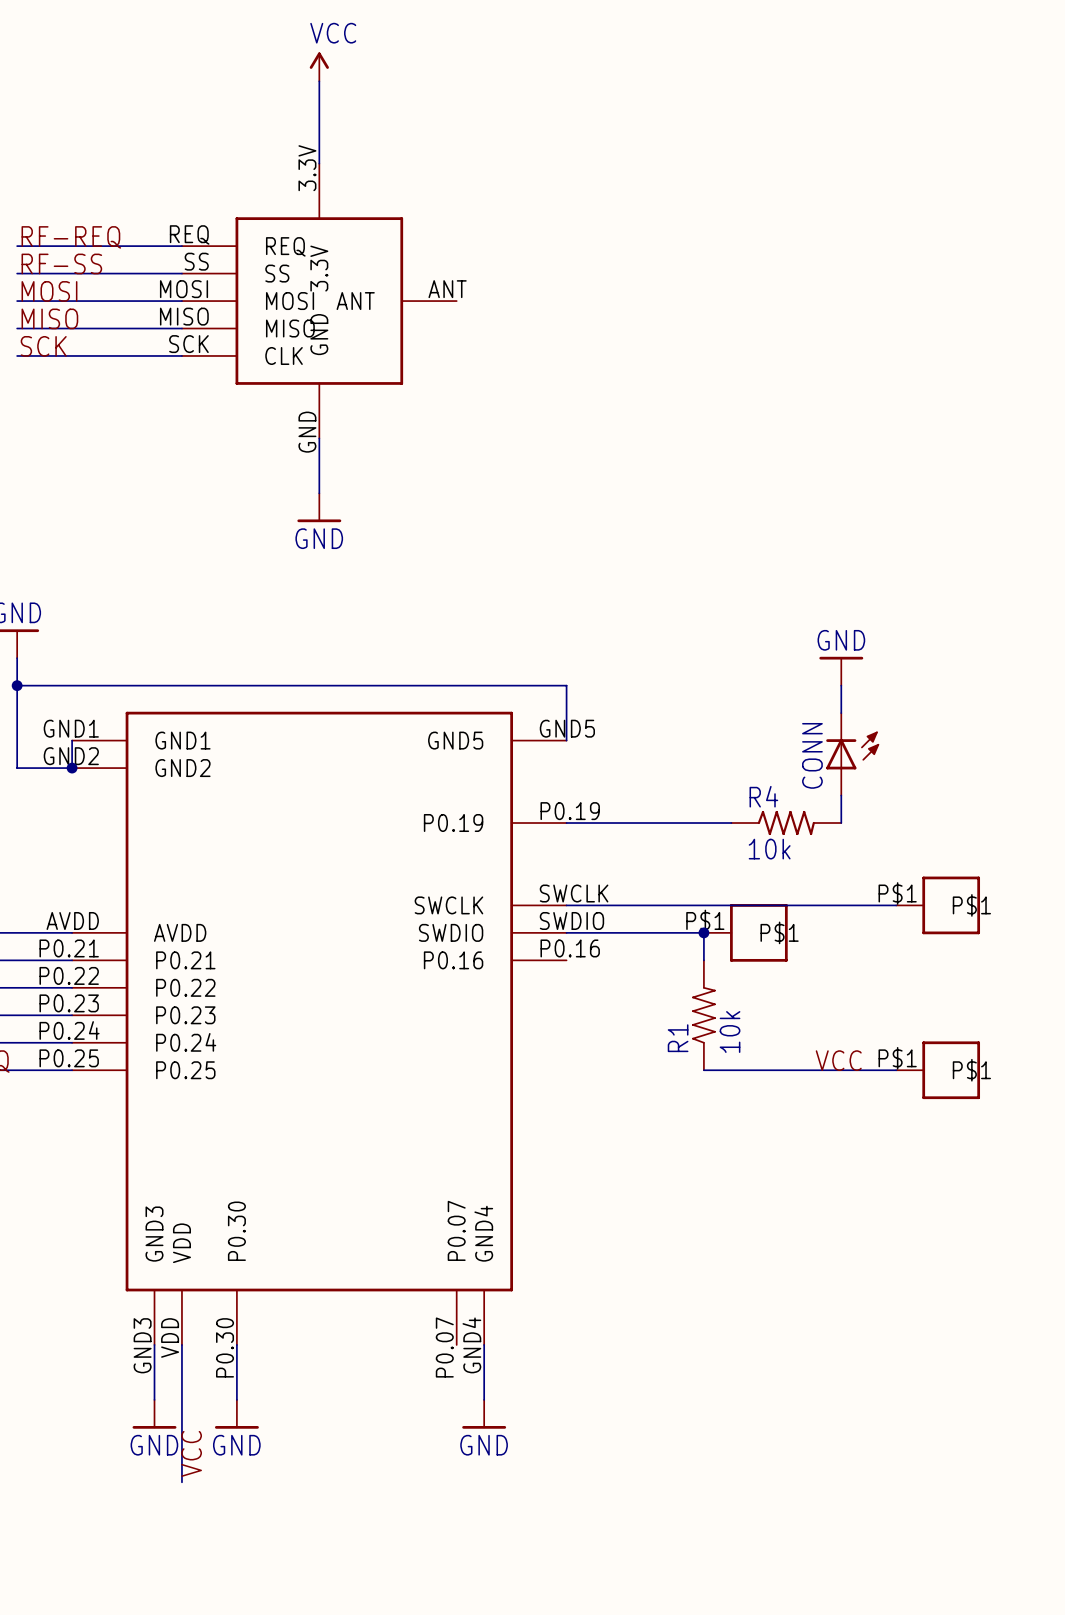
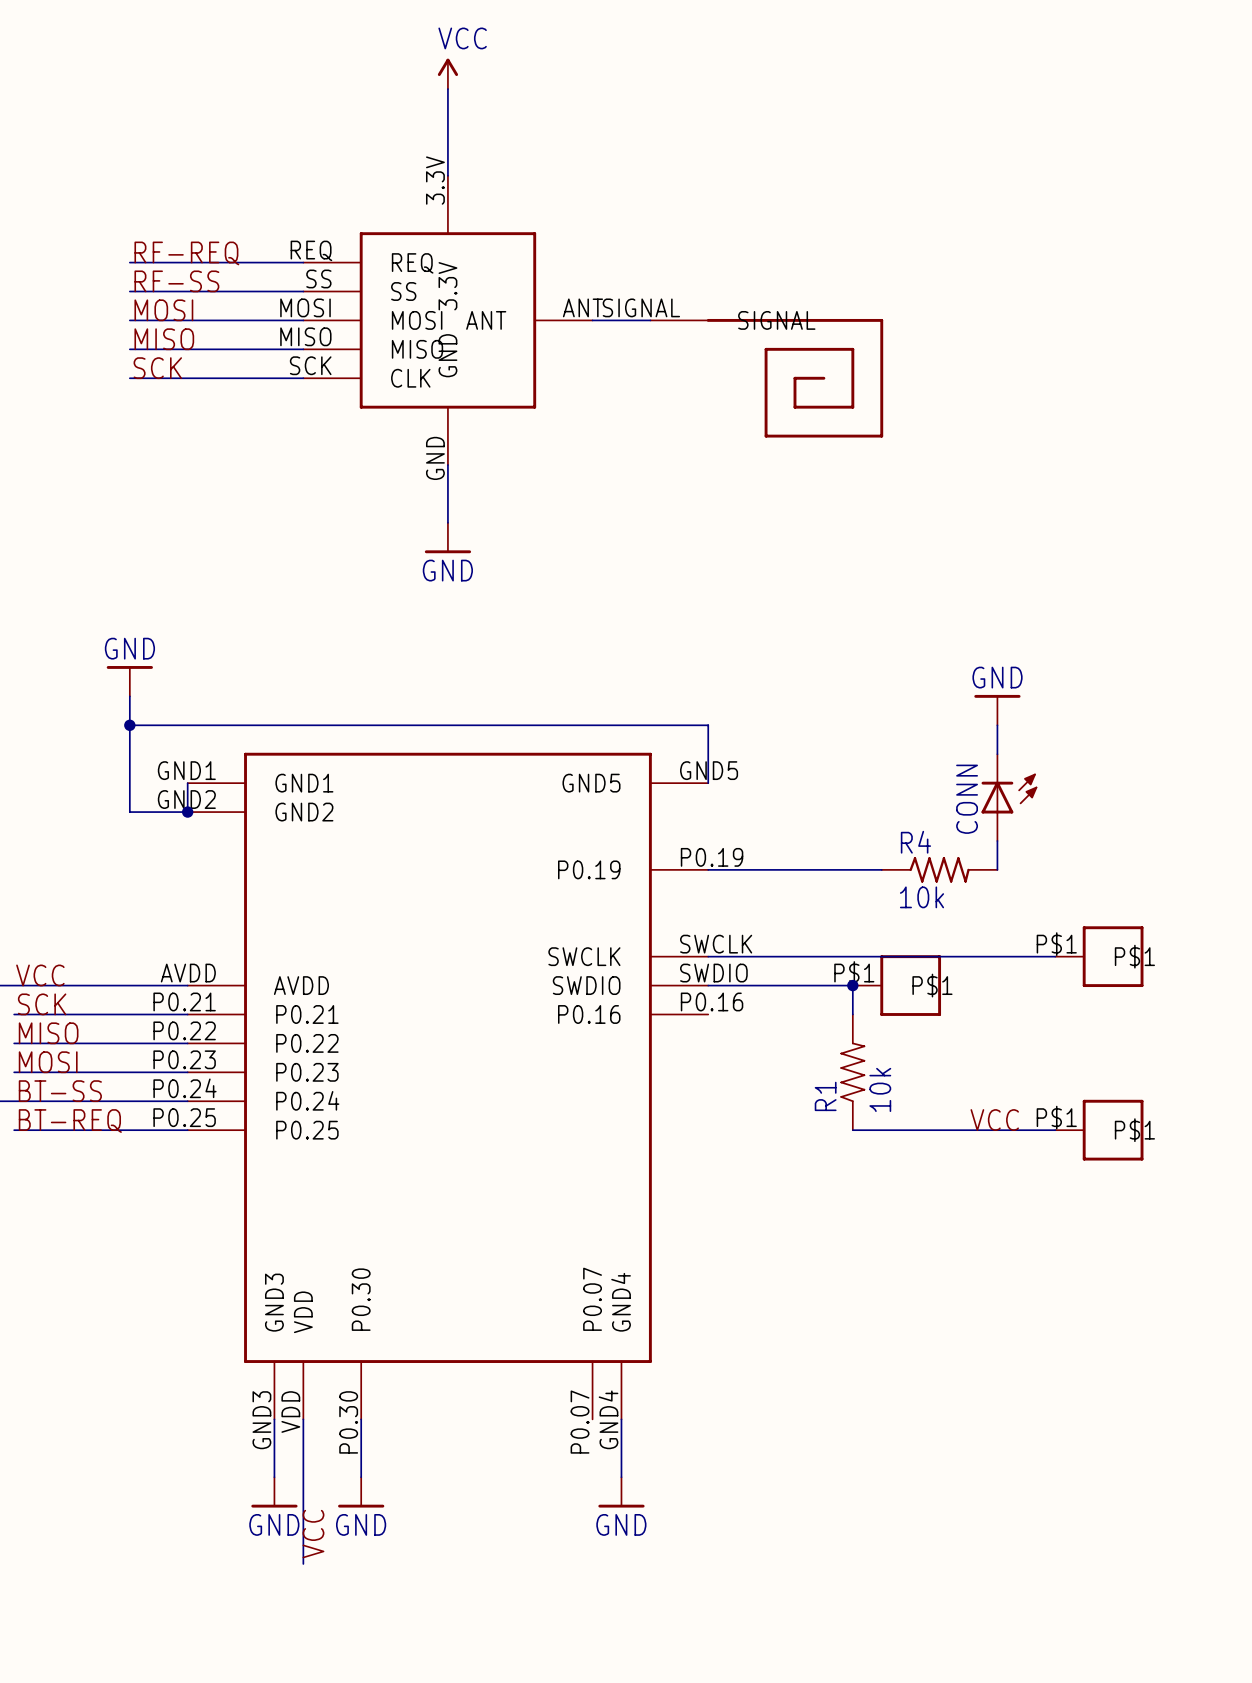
wire: none -> (592, 320) (650, 320)
part: none -> (766, 378)

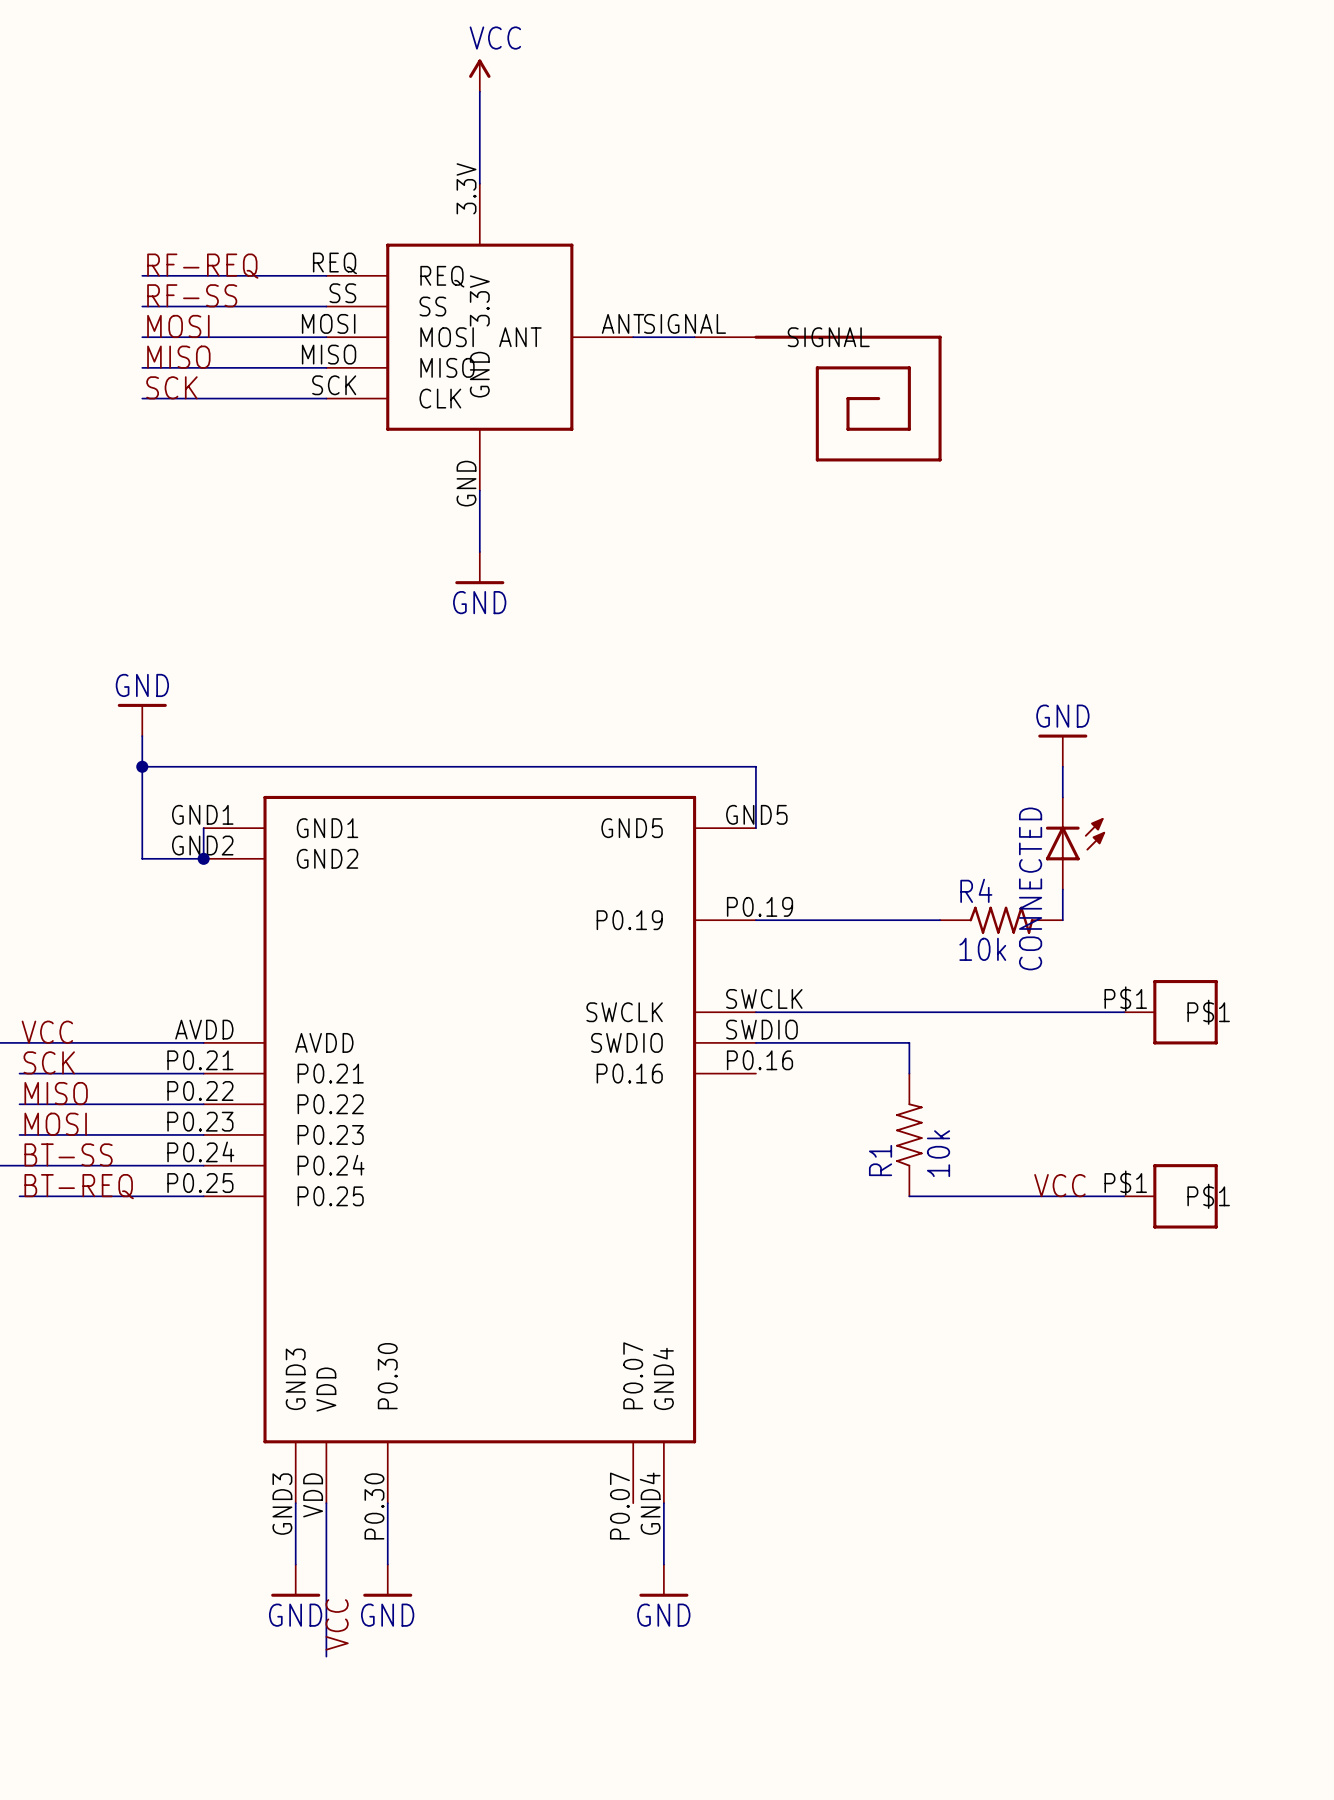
CONN name: CONN (967, 799) -> CONNECTED (1030, 888)
junction: (852, 985) -> none
part: (896, 985) -> none

